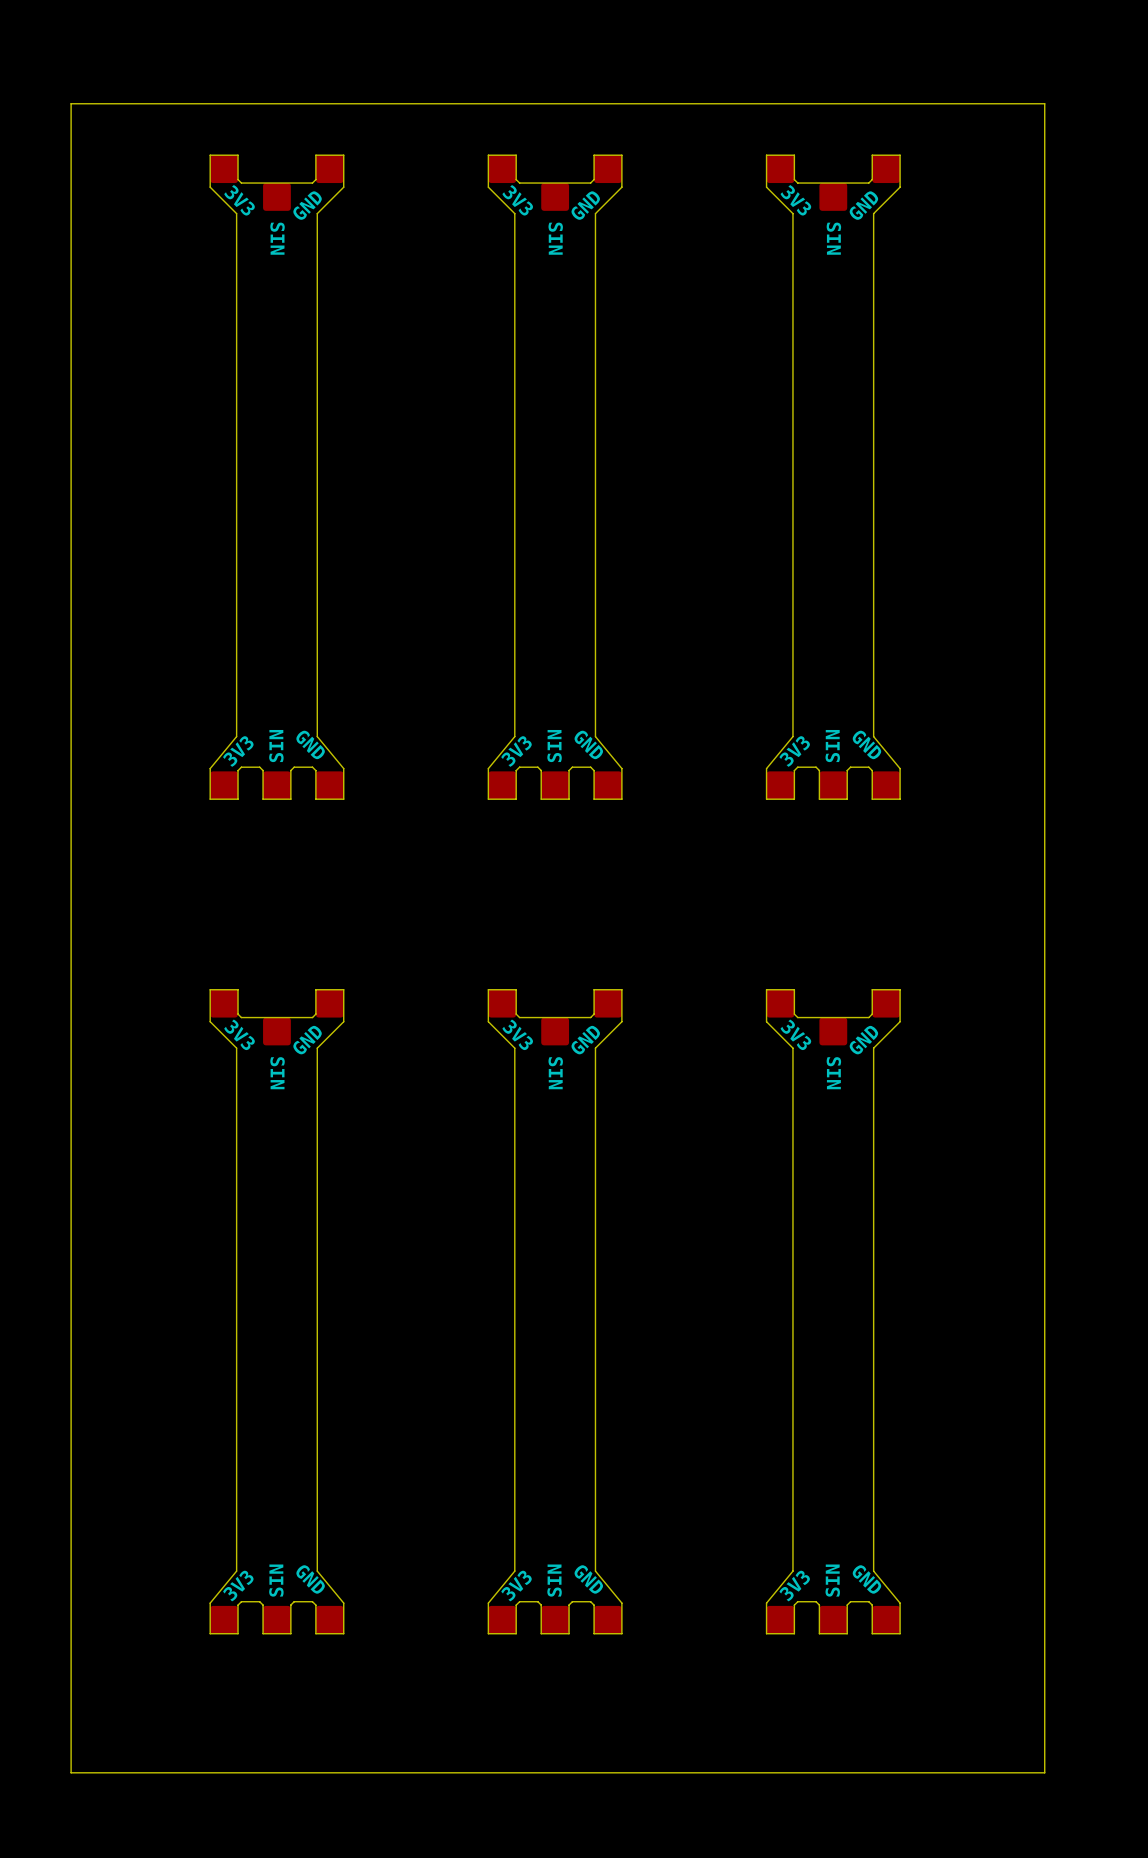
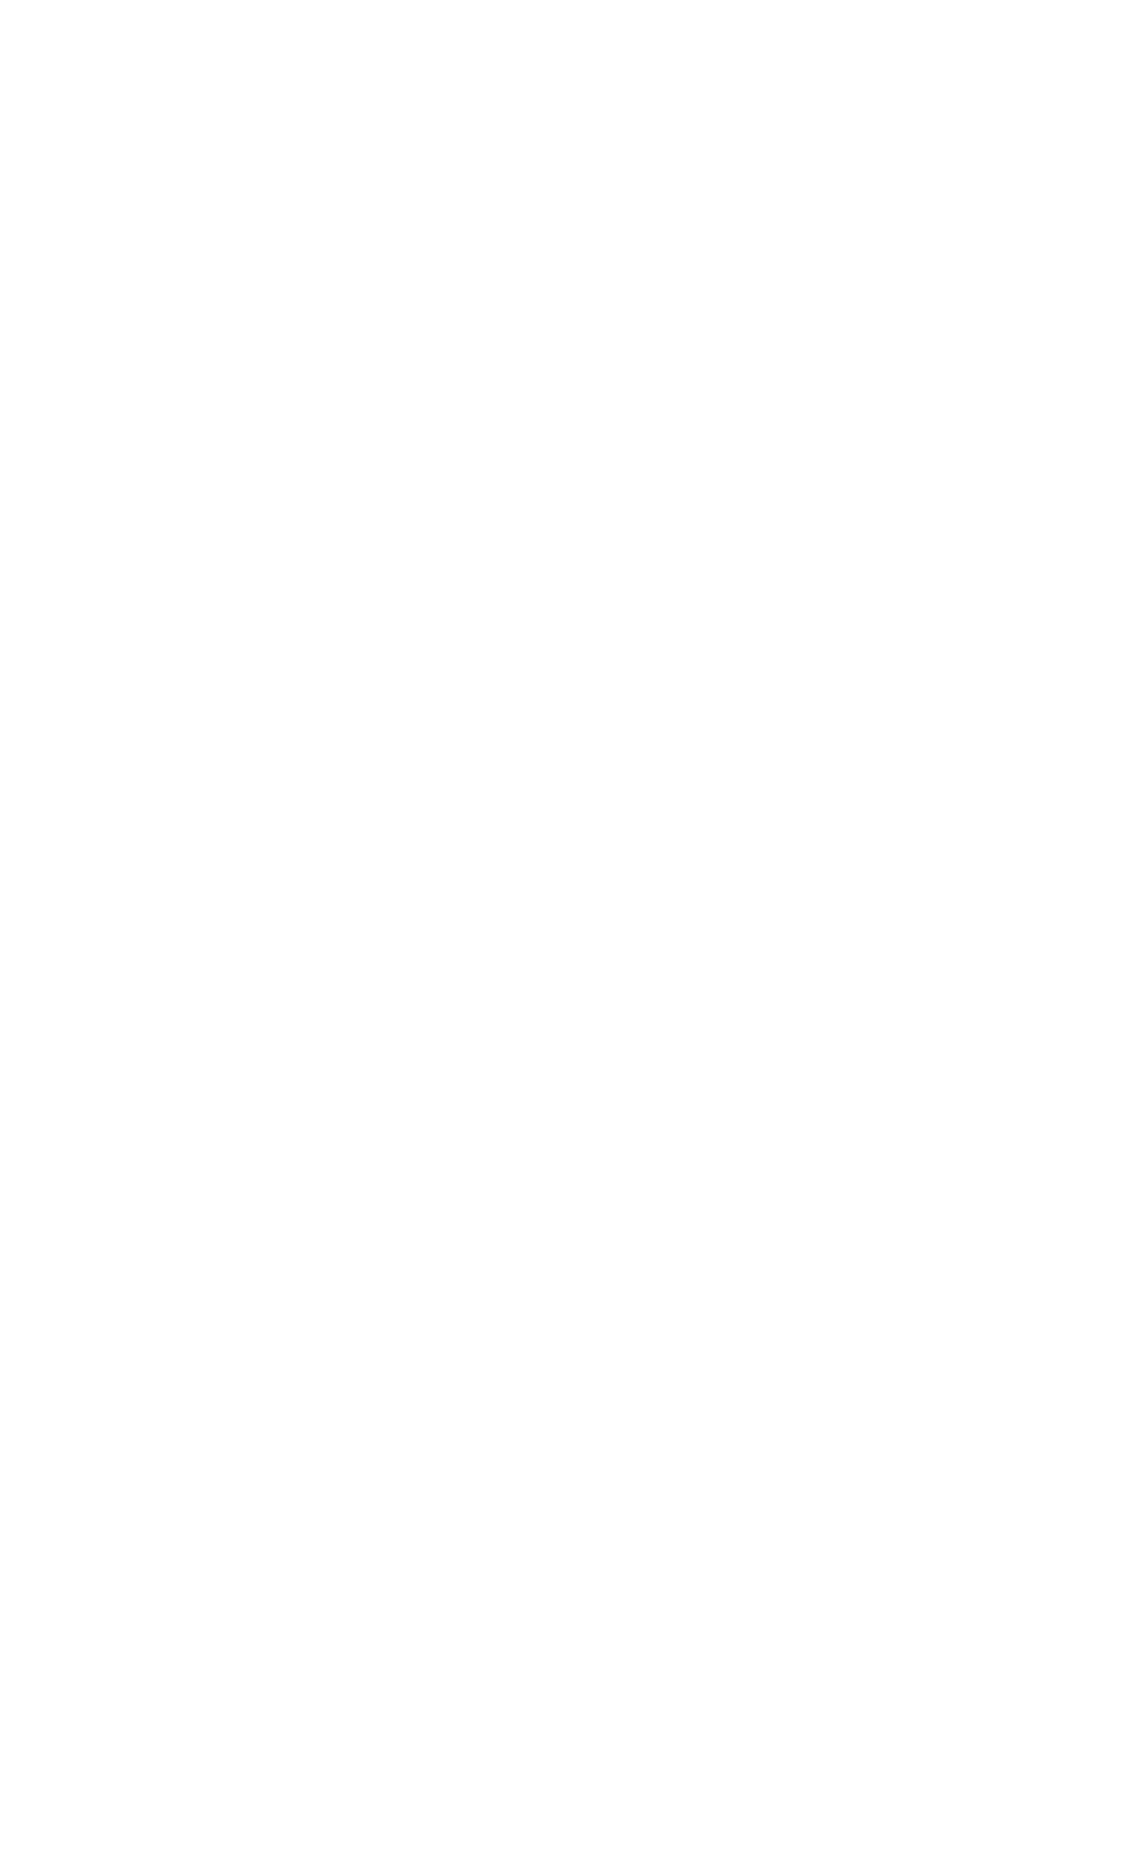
board edge: (71, 103) (1044, 103) (1044, 1772) (71, 1772) (71, 103) -> none
board edge: (210, 155) (210, 187) (236, 213) (236, 736) (210, 768) (210, 799) (238, 799) (238, 770) (241, 767) (259, 767) (263, 770) (263, 799) (290, 799) (290, 770) (294, 767) (312, 767) (315, 770) (315, 799) (343, 799) (343, 768) (317, 736) (317, 213) (343, 187) (343, 155) (315, 155) (315, 179) (312, 183) (241, 183) (238, 179) (238, 155) (210, 155) -> none
board edge: (488, 155) (488, 187) (514, 213) (514, 736) (488, 768) (488, 799) (516, 799) (516, 770) (519, 767) (537, 767) (541, 770) (541, 799) (569, 799) (569, 770) (572, 767) (590, 767) (594, 770) (594, 799) (621, 799) (621, 768) (595, 736) (595, 213) (621, 187) (621, 155) (594, 155) (594, 179) (590, 183) (519, 183) (516, 179) (516, 155) (488, 155) -> none
board edge: (766, 155) (794, 155) (794, 179) (797, 183) (868, 183) (872, 179) (872, 155) (900, 155) (900, 187) (873, 213) (873, 736) (900, 768) (900, 799) (872, 799) (872, 770) (868, 767) (850, 767) (847, 770) (847, 799) (819, 799) (819, 770) (816, 767) (797, 767) (794, 770) (794, 799) (766, 799) (766, 768) (792, 736) (792, 213) (766, 187) (766, 155) -> none
part: (224, 169) -> none
part: (329, 169) -> none
part: (502, 169) -> none
part: (607, 169) -> none
part: (780, 169) -> none
part: (886, 169) -> none
part: (276, 196) -> none
part: (555, 196) -> none
part: (833, 196) -> none
text: 3V3 (239, 200) -> none
text: 3V3 (517, 200) -> none
text: 3V3 (795, 200) -> none
text: GND (307, 205) -> none
text: GND (585, 205) -> none
text: GND (863, 205) -> none
text: SIN (277, 238) -> none
text: SIN (555, 238) -> none
text: SIN (833, 238) -> none
text: GND (310, 744) -> none
text: GND (588, 744) -> none
text: GND (866, 744) -> none
text: SIN (276, 746) -> none
text: SIN (554, 746) -> none
text: SIN (832, 746) -> none
text: 3V3 (238, 751) -> none
text: 3V3 (516, 751) -> none
text: 3V3 (794, 751) -> none
part: (224, 785) -> none
part: (276, 785) -> none
part: (329, 785) -> none
part: (502, 785) -> none
part: (555, 785) -> none
part: (607, 785) -> none
part: (780, 785) -> none
part: (833, 785) -> none
part: (886, 785) -> none
board edge: (210, 989) (210, 1021) (236, 1048) (236, 1571) (210, 1603) (210, 1633) (238, 1633) (238, 1605) (241, 1601) (259, 1601) (263, 1605) (263, 1633) (290, 1633) (290, 1605) (294, 1601) (312, 1601) (315, 1605) (315, 1633) (343, 1633) (343, 1603) (317, 1571) (317, 1048) (343, 1021) (343, 989) (315, 989) (315, 1014) (312, 1017) (241, 1017) (238, 1014) (238, 989) (210, 989) -> none
board edge: (488, 989) (488, 1021) (514, 1048) (514, 1571) (488, 1603) (488, 1633) (516, 1633) (516, 1605) (519, 1601) (537, 1601) (541, 1605) (541, 1633) (569, 1633) (569, 1605) (572, 1601) (590, 1601) (594, 1605) (594, 1633) (621, 1633) (621, 1603) (595, 1571) (595, 1048) (621, 1021) (621, 989) (594, 989) (594, 1014) (590, 1017) (519, 1017) (516, 1014) (516, 989) (488, 989) -> none
board edge: (766, 989) (794, 989) (794, 1014) (797, 1017) (868, 1017) (872, 1014) (872, 989) (900, 989) (900, 1021) (873, 1048) (873, 1571) (900, 1603) (900, 1633) (872, 1633) (872, 1605) (868, 1601) (850, 1601) (847, 1605) (847, 1633) (819, 1633) (819, 1605) (816, 1601) (797, 1601) (794, 1605) (794, 1633) (766, 1633) (766, 1603) (792, 1571) (792, 1048) (766, 1021) (766, 989) -> none
part: (224, 1003) -> none
part: (329, 1003) -> none
part: (502, 1003) -> none
part: (607, 1003) -> none
part: (780, 1003) -> none
part: (886, 1003) -> none
part: (276, 1031) -> none
part: (555, 1031) -> none
part: (833, 1031) -> none
text: 3V3 (239, 1034) -> none
text: 3V3 (517, 1034) -> none
text: 3V3 (795, 1034) -> none
text: GND (307, 1040) -> none
text: GND (585, 1040) -> none
text: GND (863, 1040) -> none
text: SIN (277, 1073) -> none
text: SIN (555, 1073) -> none
text: SIN (833, 1073) -> none
text: GND (310, 1579) -> none
text: GND (588, 1579) -> none
text: GND (866, 1579) -> none
text: SIN (276, 1580) -> none
text: SIN (554, 1580) -> none
text: SIN (832, 1580) -> none
text: 3V3 (238, 1585) -> none
text: 3V3 (516, 1585) -> none
text: 3V3 (794, 1585) -> none
part: (224, 1619) -> none
part: (276, 1619) -> none
part: (329, 1619) -> none
part: (502, 1619) -> none
part: (555, 1619) -> none
part: (607, 1619) -> none
part: (780, 1619) -> none
part: (833, 1619) -> none
part: (886, 1619) -> none

